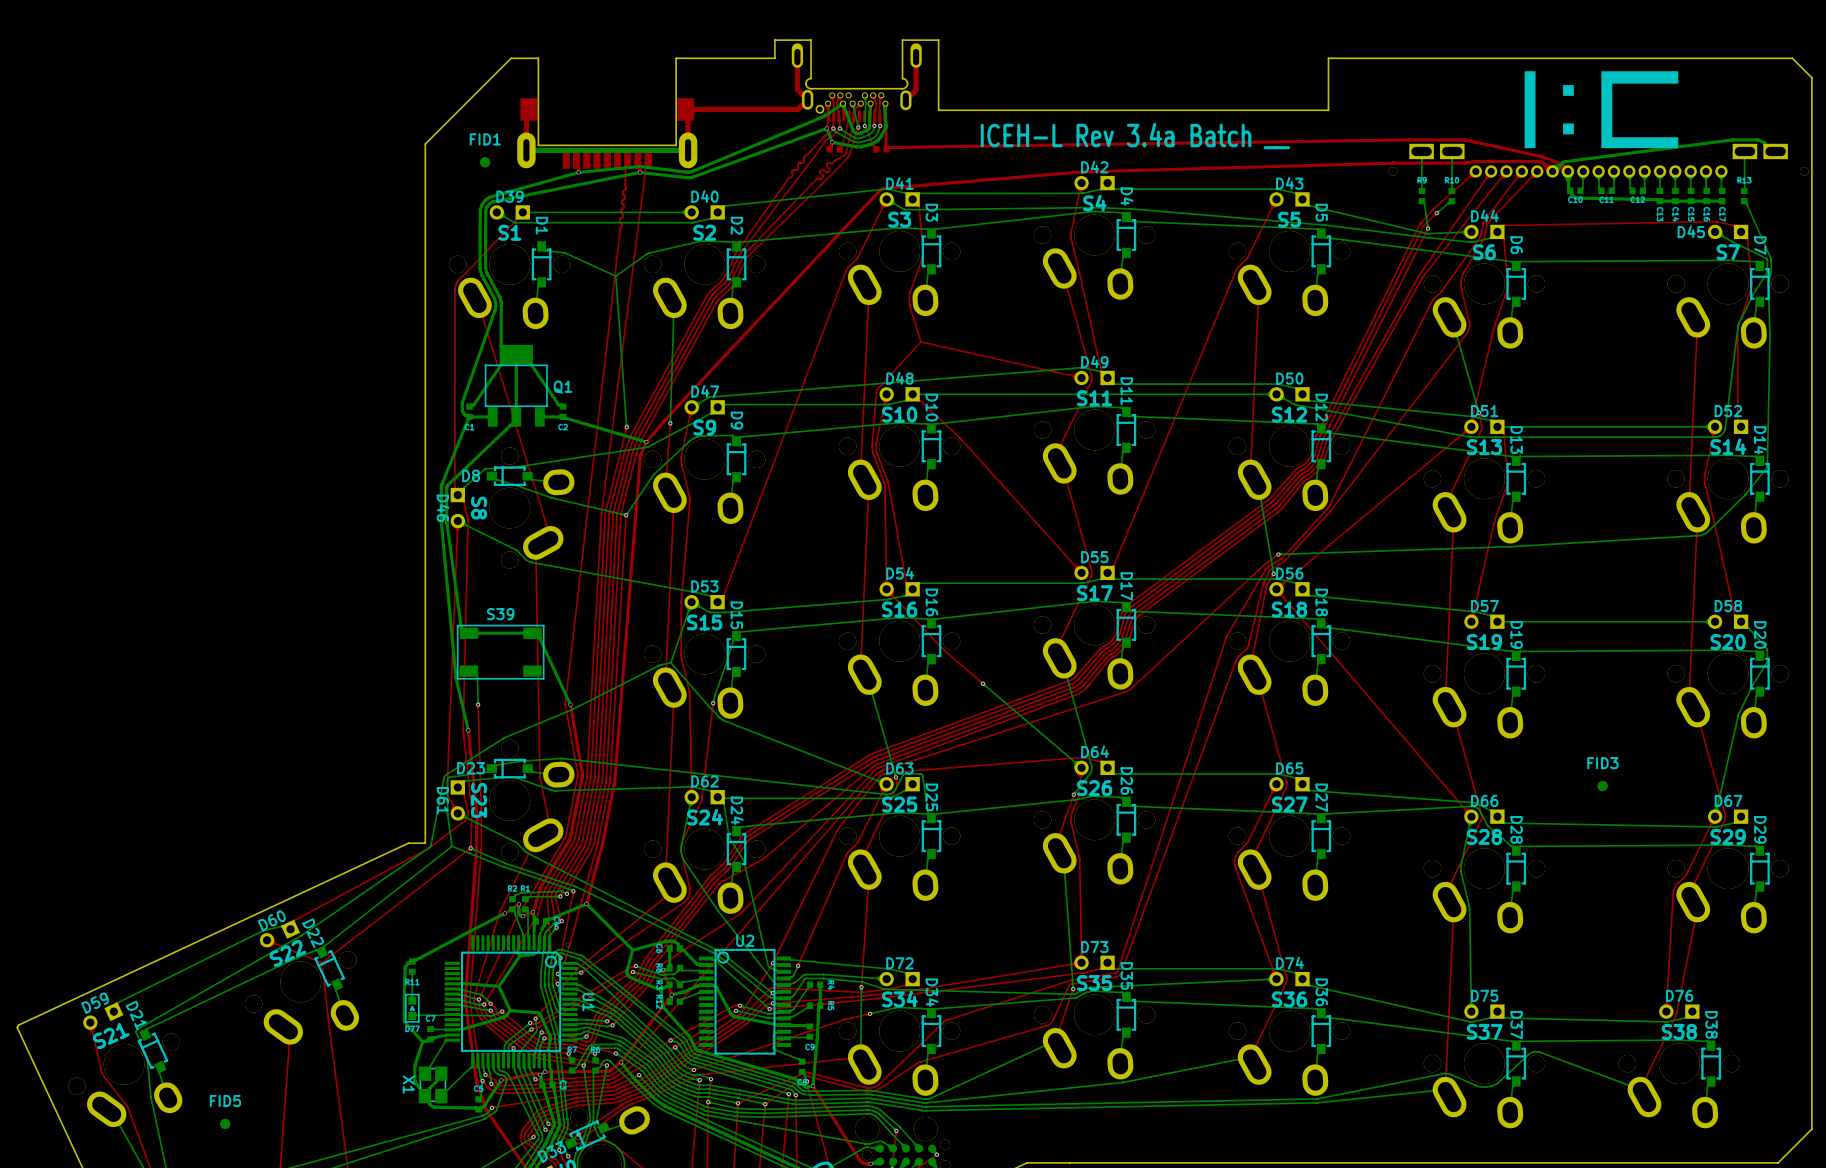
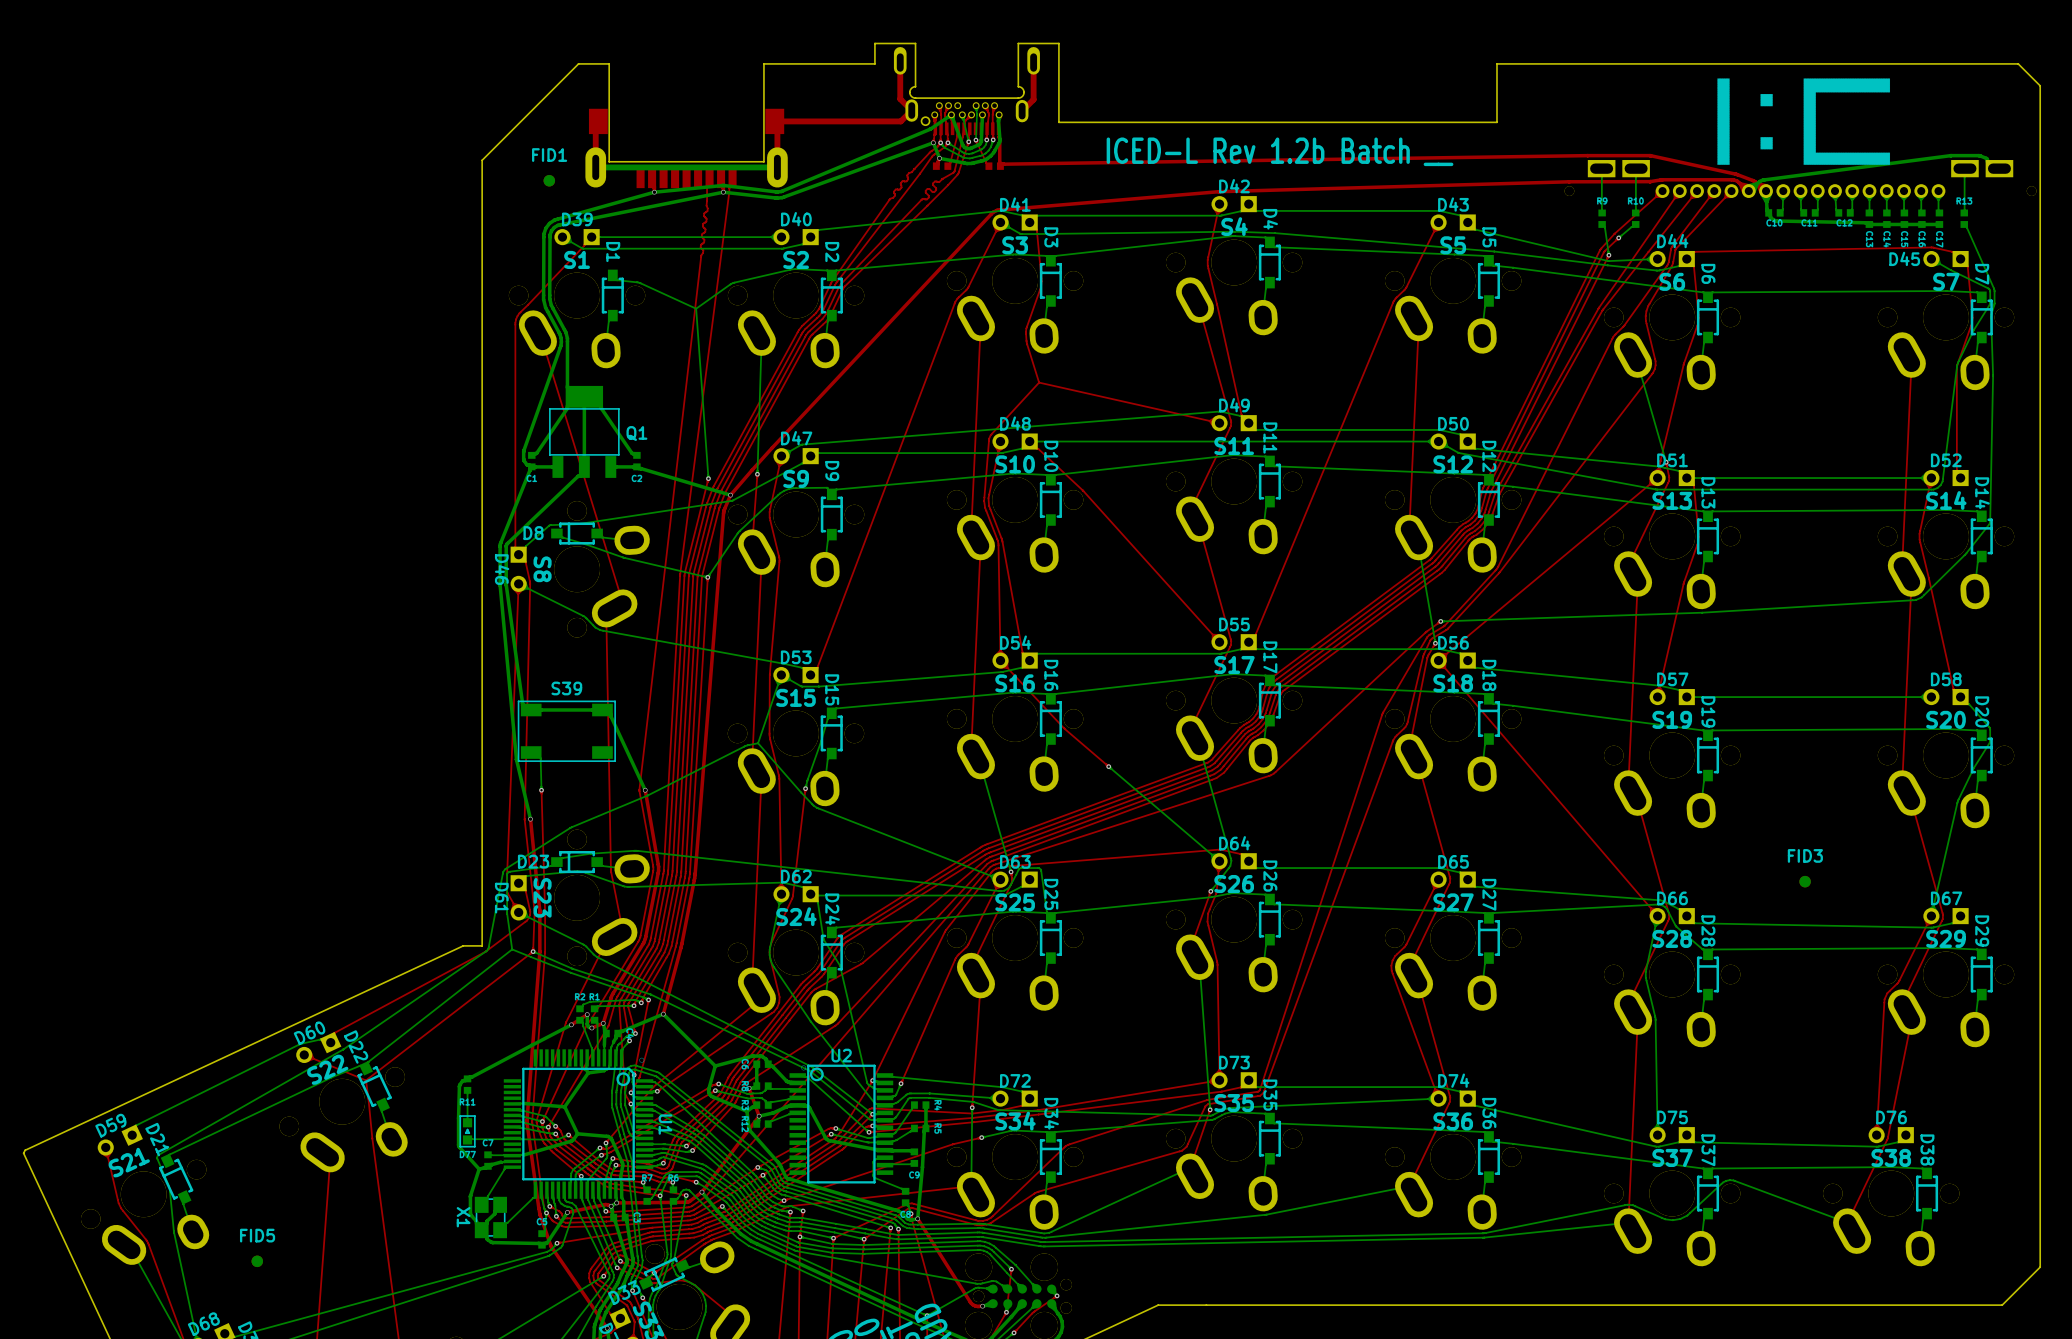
text: ICEH-L Rev 3.4a Batch __ (1135, 136) -> ICED-L Rev 1.2b Batch __ (1280, 151)

